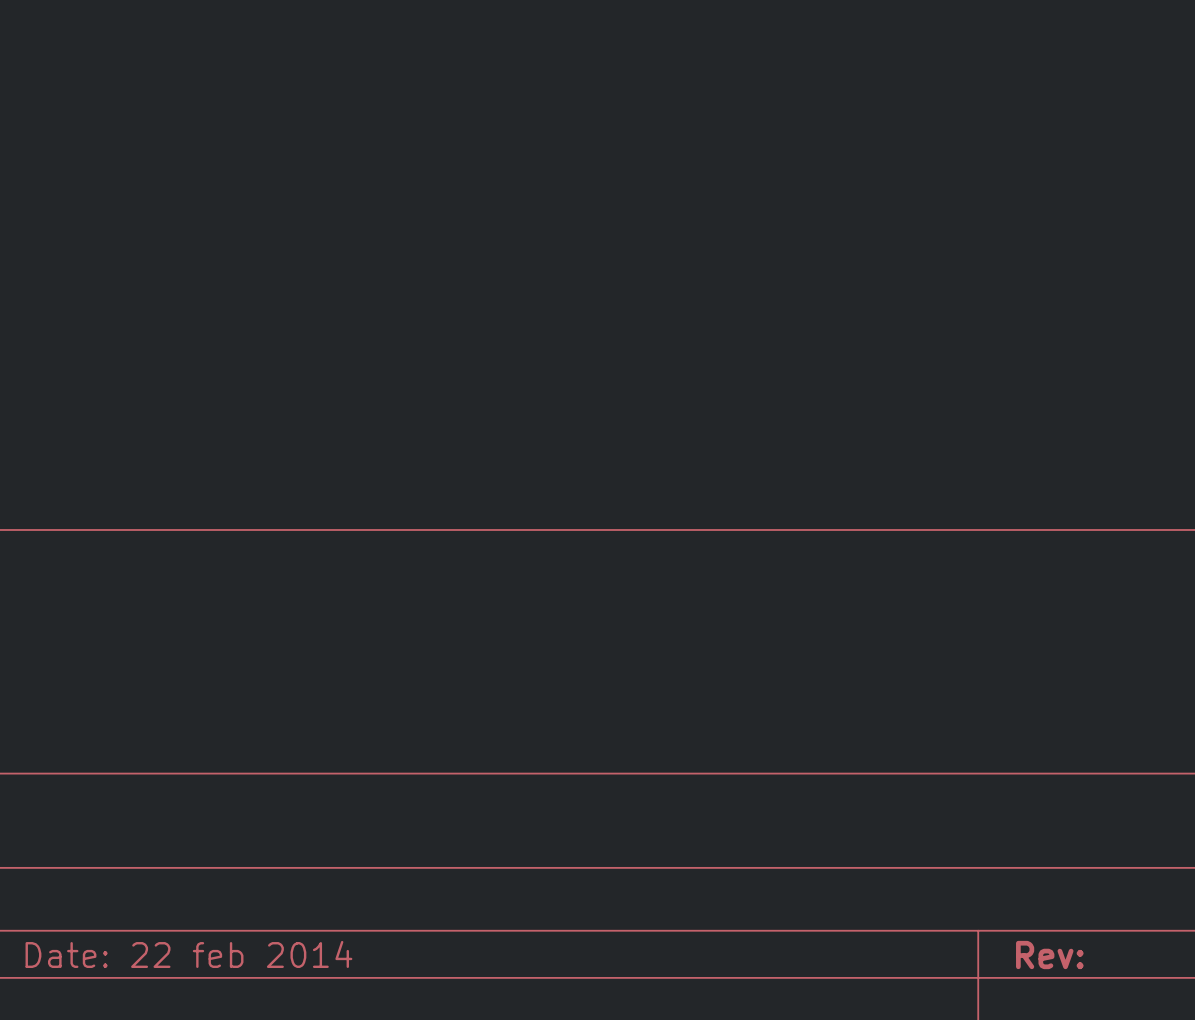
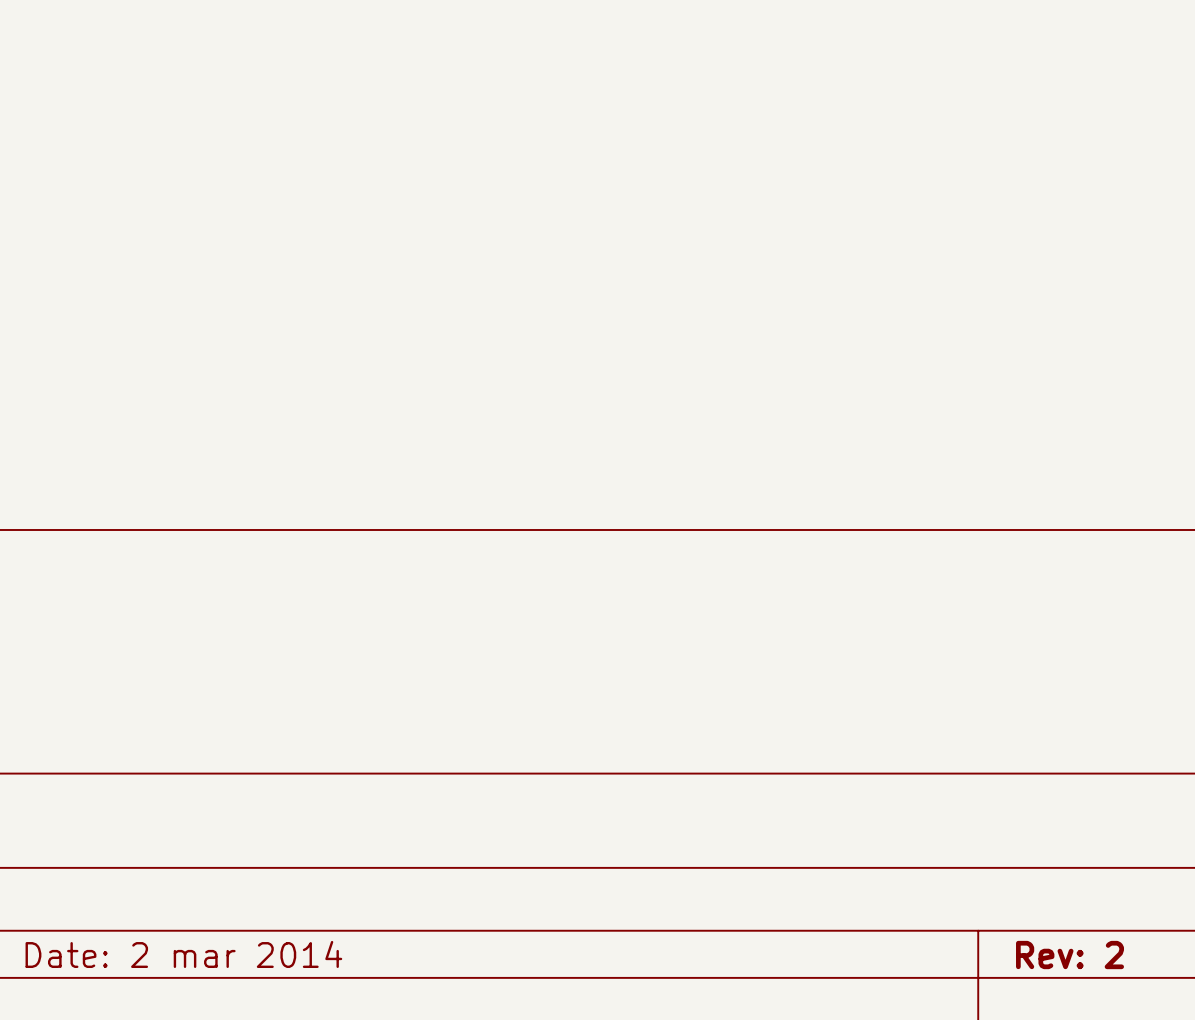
title block: Date: 22 feb 2014 (188, 954) -> Date: 2 mar 2014 (183, 954)
title block: Rev: (1049, 955) -> Rev: 2 (1070, 955)

